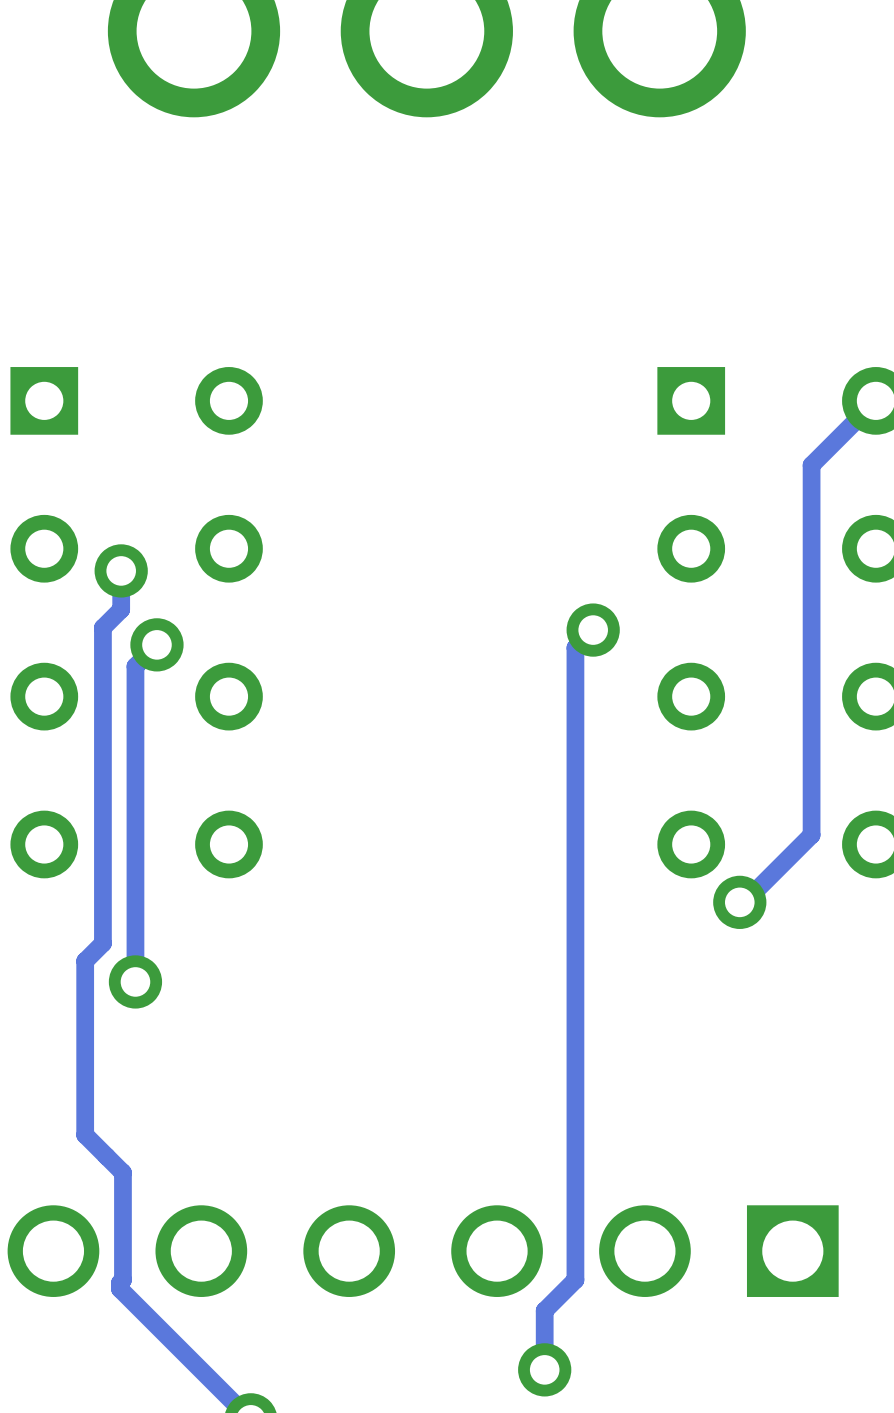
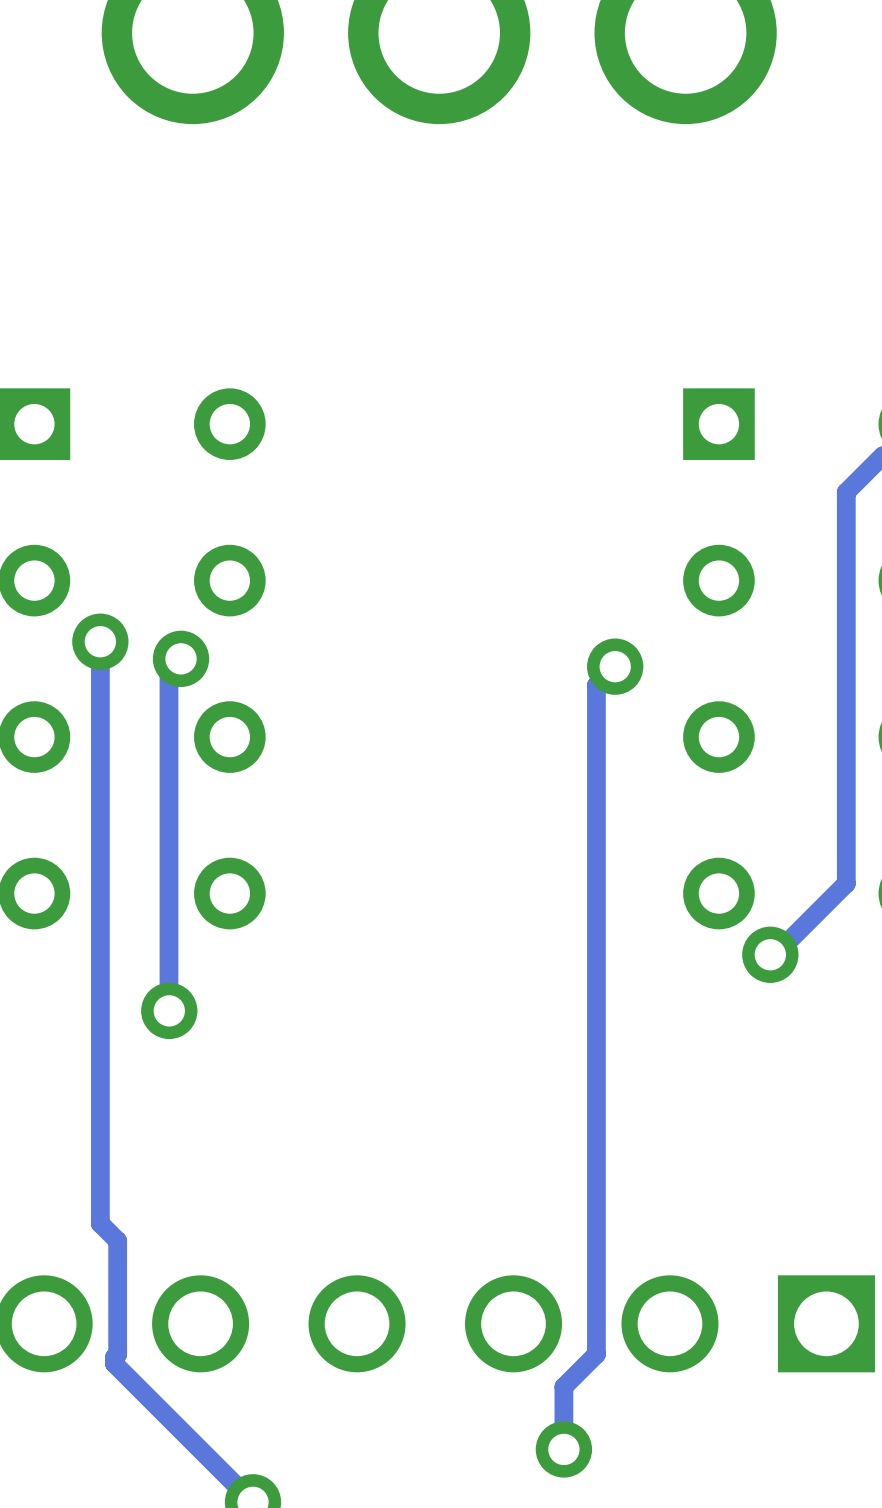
track: (121, 570) (121, 609) (102, 627) (102, 943) (85, 961) (85, 1135) (106, 1156) -> (100, 641) (100, 1223)
via: (121, 570) -> none
via: none -> (100, 641)
track: none -> (181, 658) (168, 670) (168, 1010)
via: none -> (181, 658)
track: (156, 644) (135, 666) (135, 981) -> none
via: (156, 644) -> none
via position: (135, 981) -> (169, 1010)

